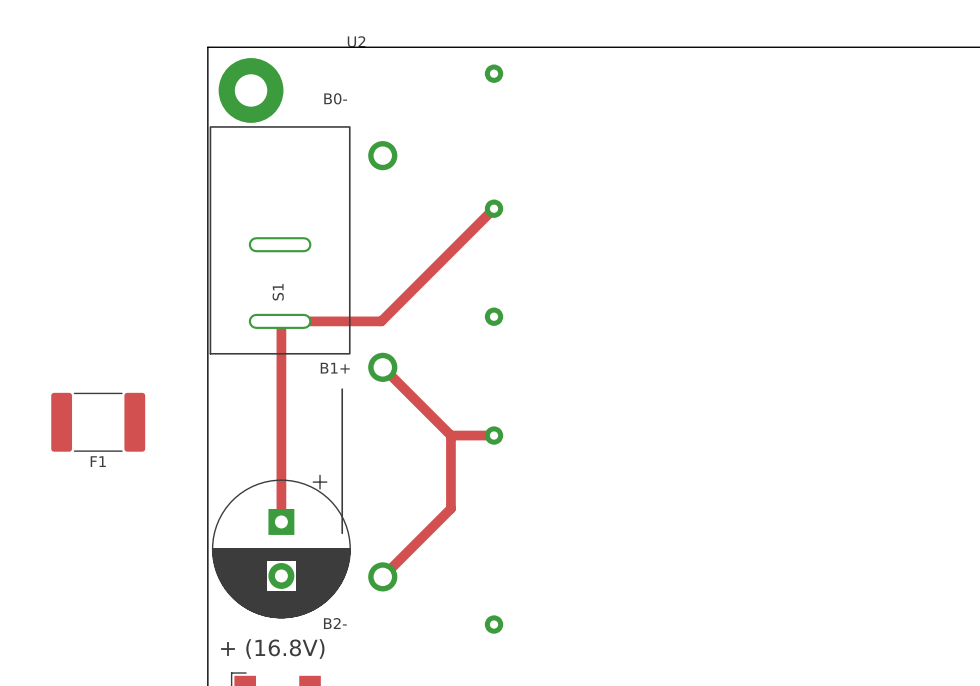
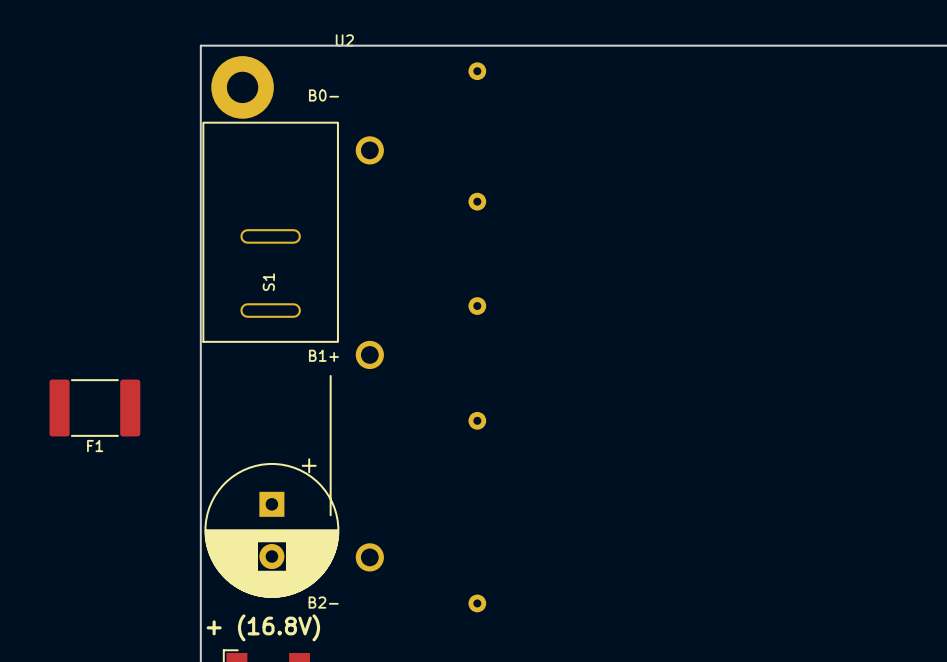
track: (494, 208) (381, 321) (280, 321) -> none
track: (281, 321) (281, 521) -> none
track: (382, 367) (450, 435) -> none
track: (450, 435) (494, 435) -> none
track: (450, 435) (450, 508) (382, 576) -> none

